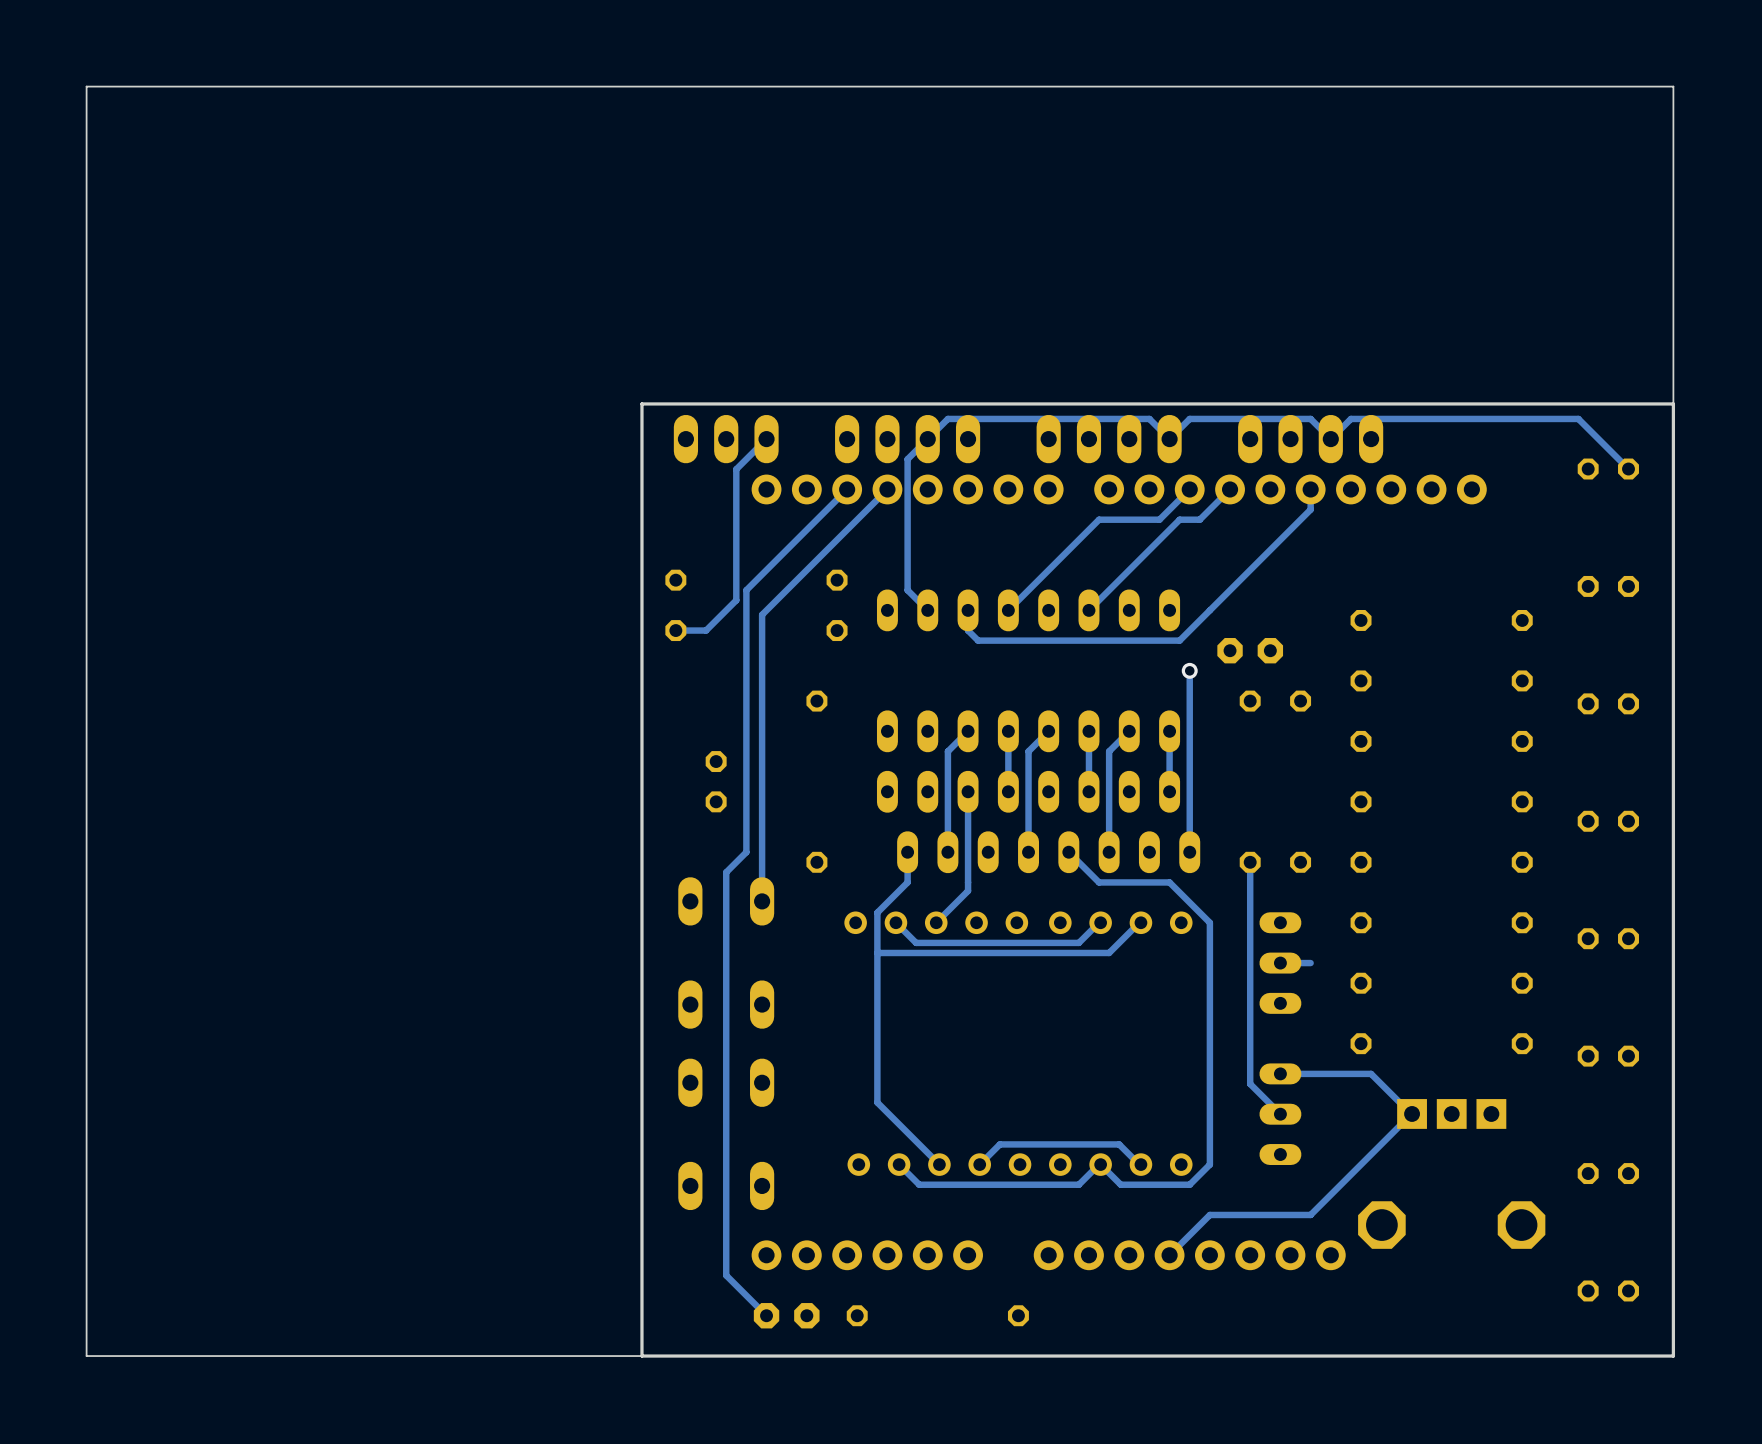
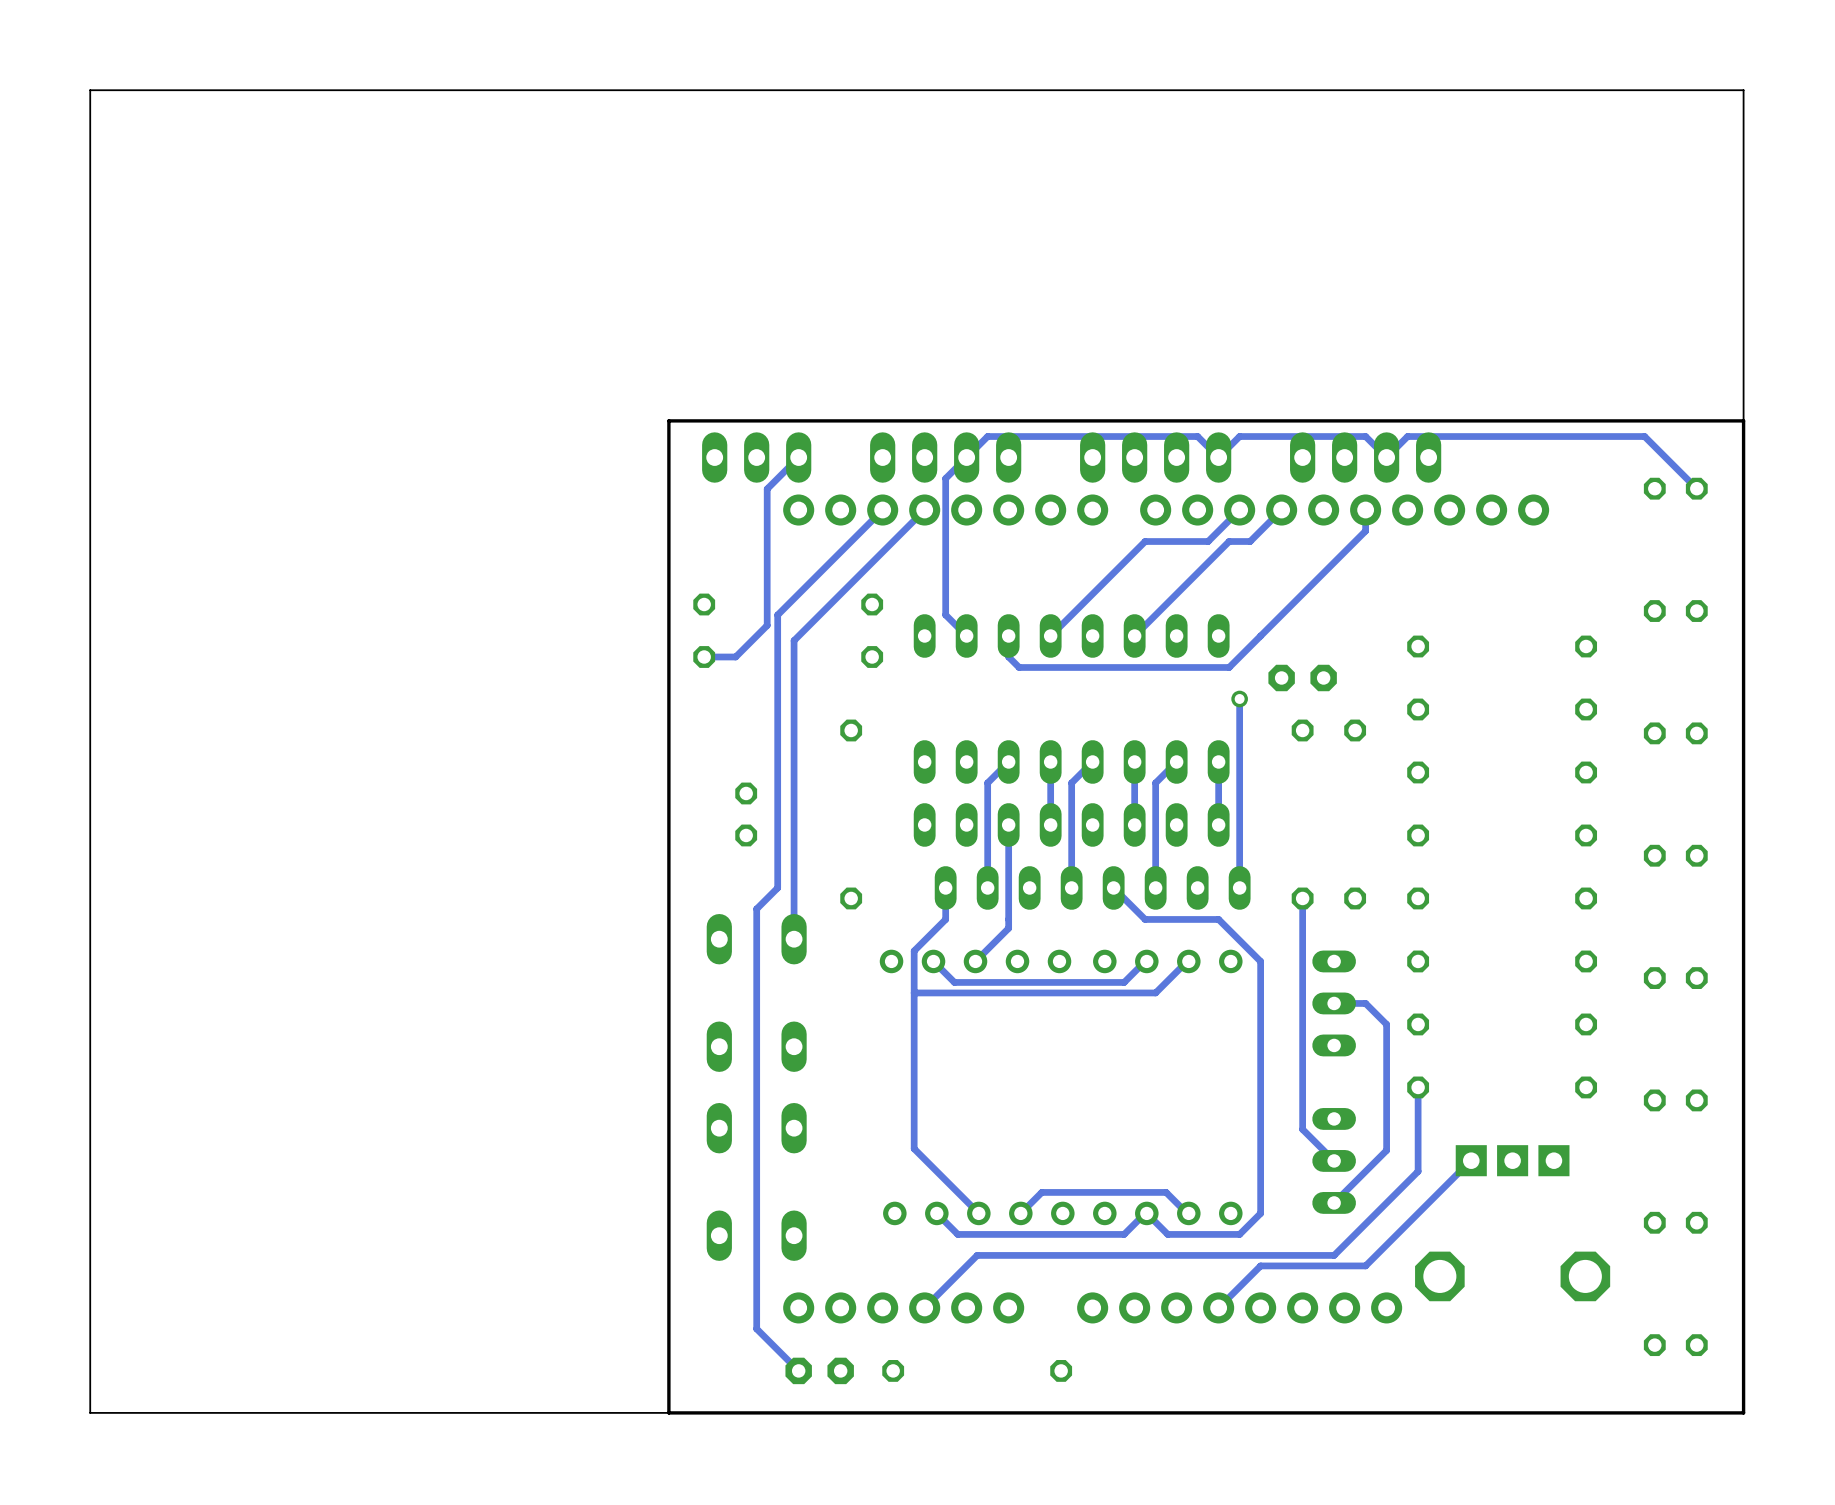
track: none -> (1365, 1003) (1386, 1024) (1386, 1150) (1334, 1202)
track: none -> (1418, 1087) (1418, 1171) (1334, 1255) (977, 1255) (924, 1307)
track: (1280, 1073) (1371, 1073) (1411, 1113) -> none

